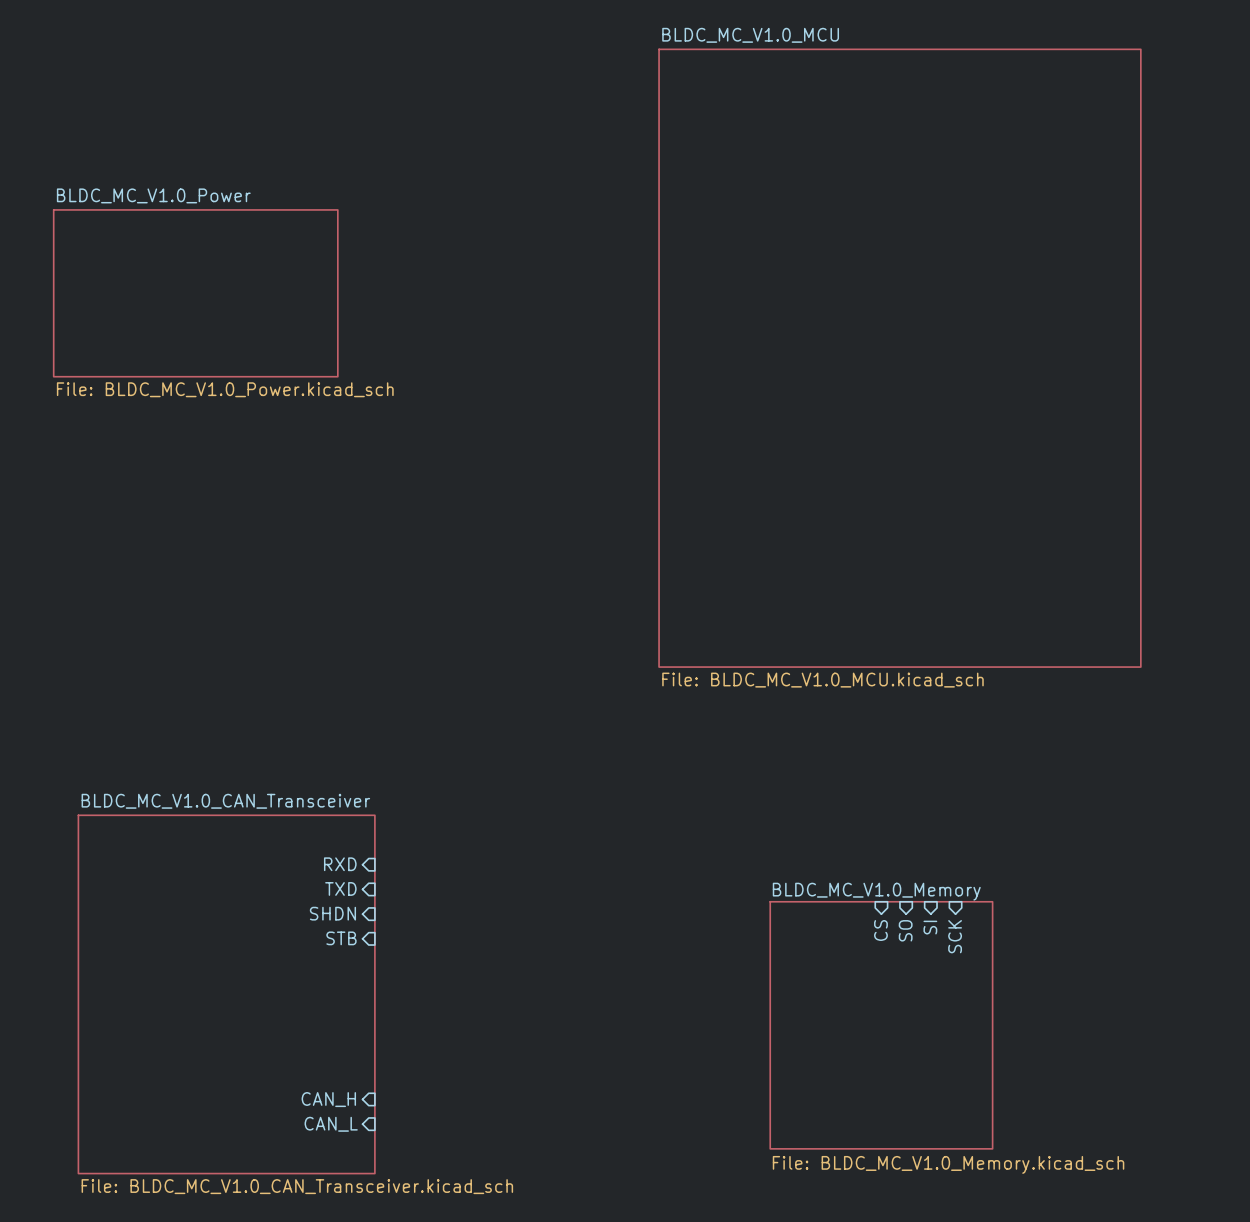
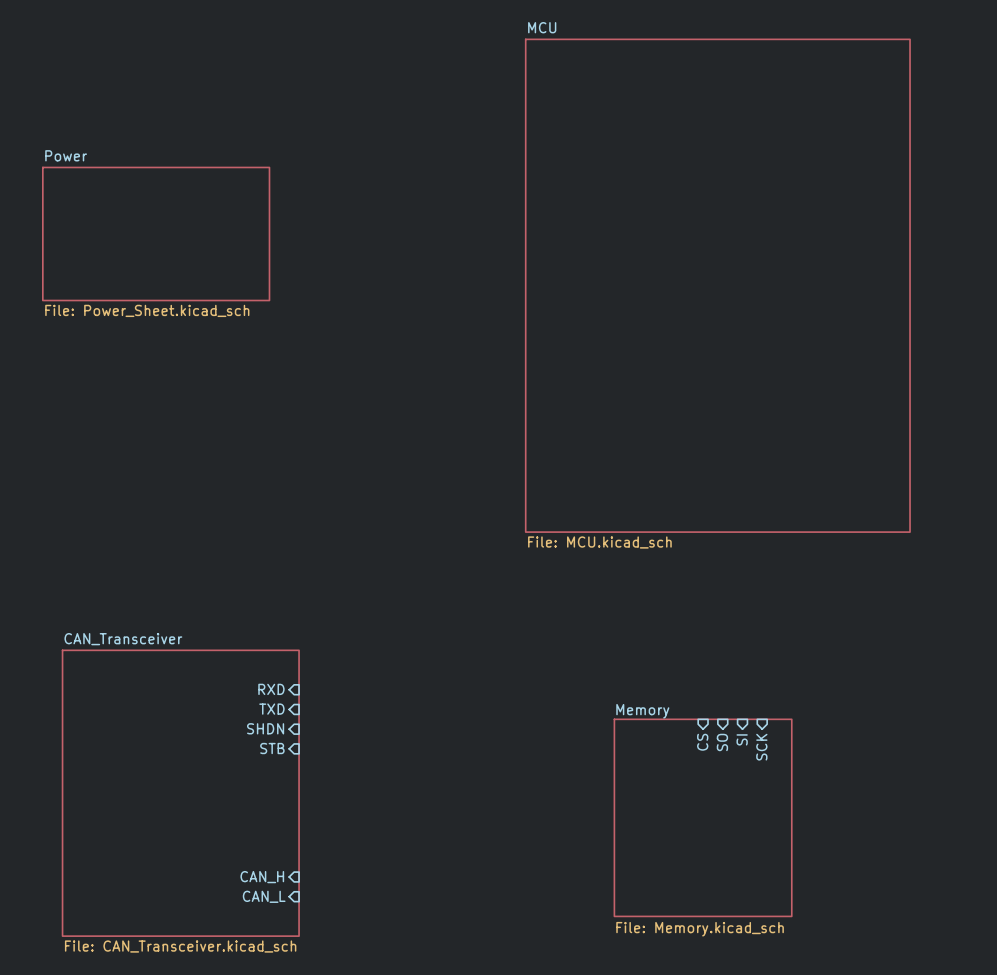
sheet BLDC_MC_V1.0_MCU name: BLDC_MC_V1.0_MCU (750, 35) -> MCU (542, 27)
sheet BLDC_MC_V1.0_Power name: BLDC_MC_V1.0_Power (153, 195) -> Power (66, 155)
sheet BLDC_MC_V1.0_Power value: File: BLDC_MC_V1.0_Power.kicad_sch (225, 389) -> File: Power_Sheet.kicad_sch (147, 310)
sheet BLDC_MC_V1.0_MCU value: File: BLDC_MC_V1.0_MCU.kicad_sch (822, 680) -> File: MCU.kicad_sch (599, 542)
sheet BLDC_MC_V1.0_CAN_Transceiver name: BLDC_MC_V1.0_CAN_Transceiver (225, 801) -> CAN_Transceiver (123, 639)
sheet BLDC_MC_V1.0_Memory name: BLDC_MC_V1.0_Memory (876, 891) -> Memory (642, 711)
sheet BLDC_MC_V1.0_Memory value: File: BLDC_MC_V1.0_Memory.kicad_sch (948, 1164) -> File: Memory.kicad_sch (700, 929)
sheet BLDC_MC_V1.0_CAN_Transceiver value: File: BLDC_MC_V1.0_CAN_Transceiver.kicad_sch (297, 1186) -> File: CAN_Transceiver.kicad_sch (180, 946)

